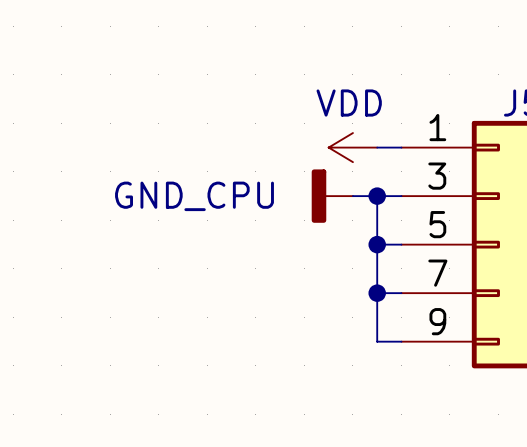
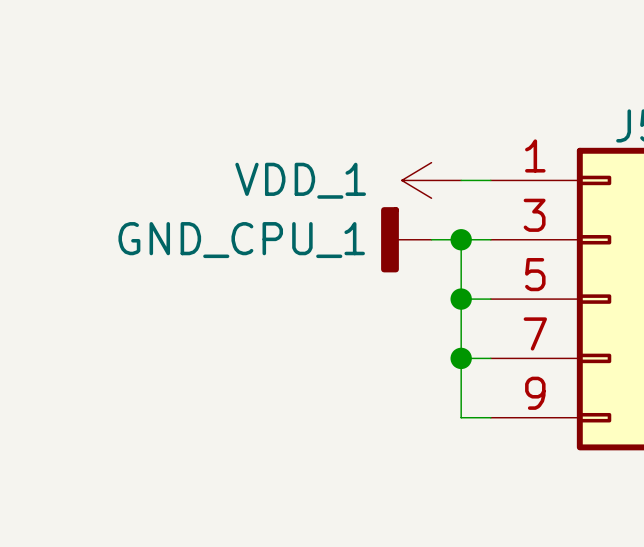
power symbol: VDD (352, 147) -> VDD_1 (431, 180)
power symbol: GND_CPU (332, 196) -> GND_CPU_1 (406, 239)

